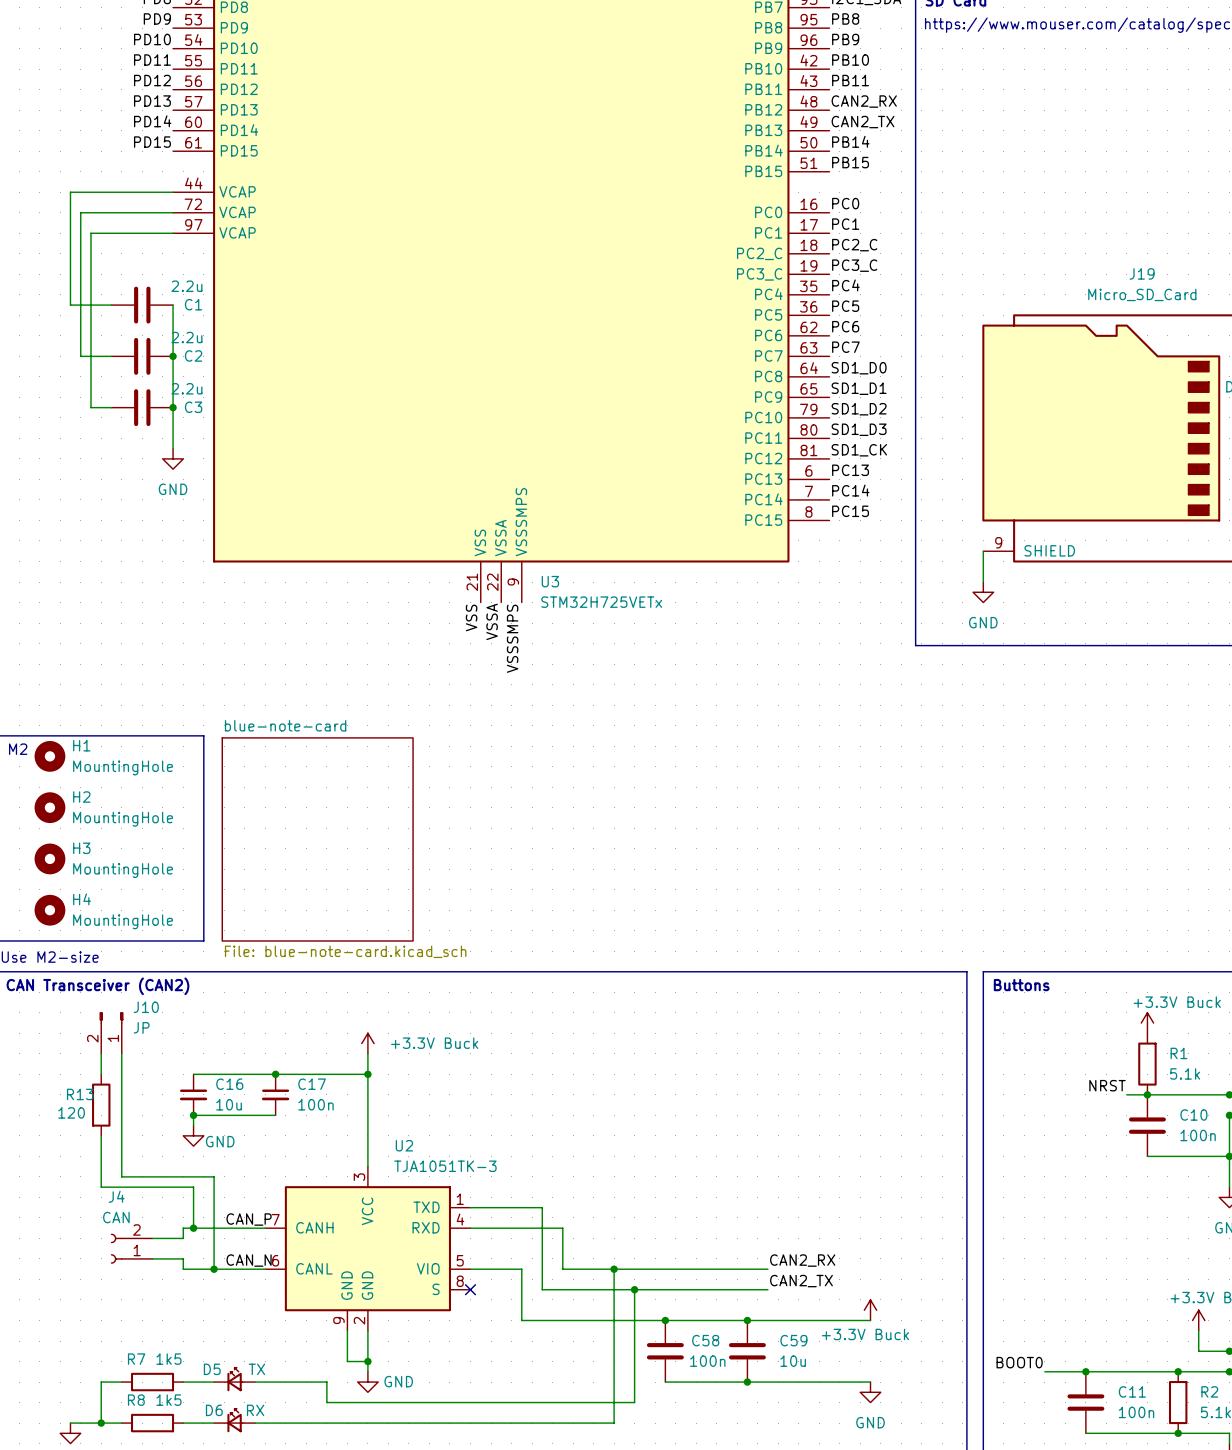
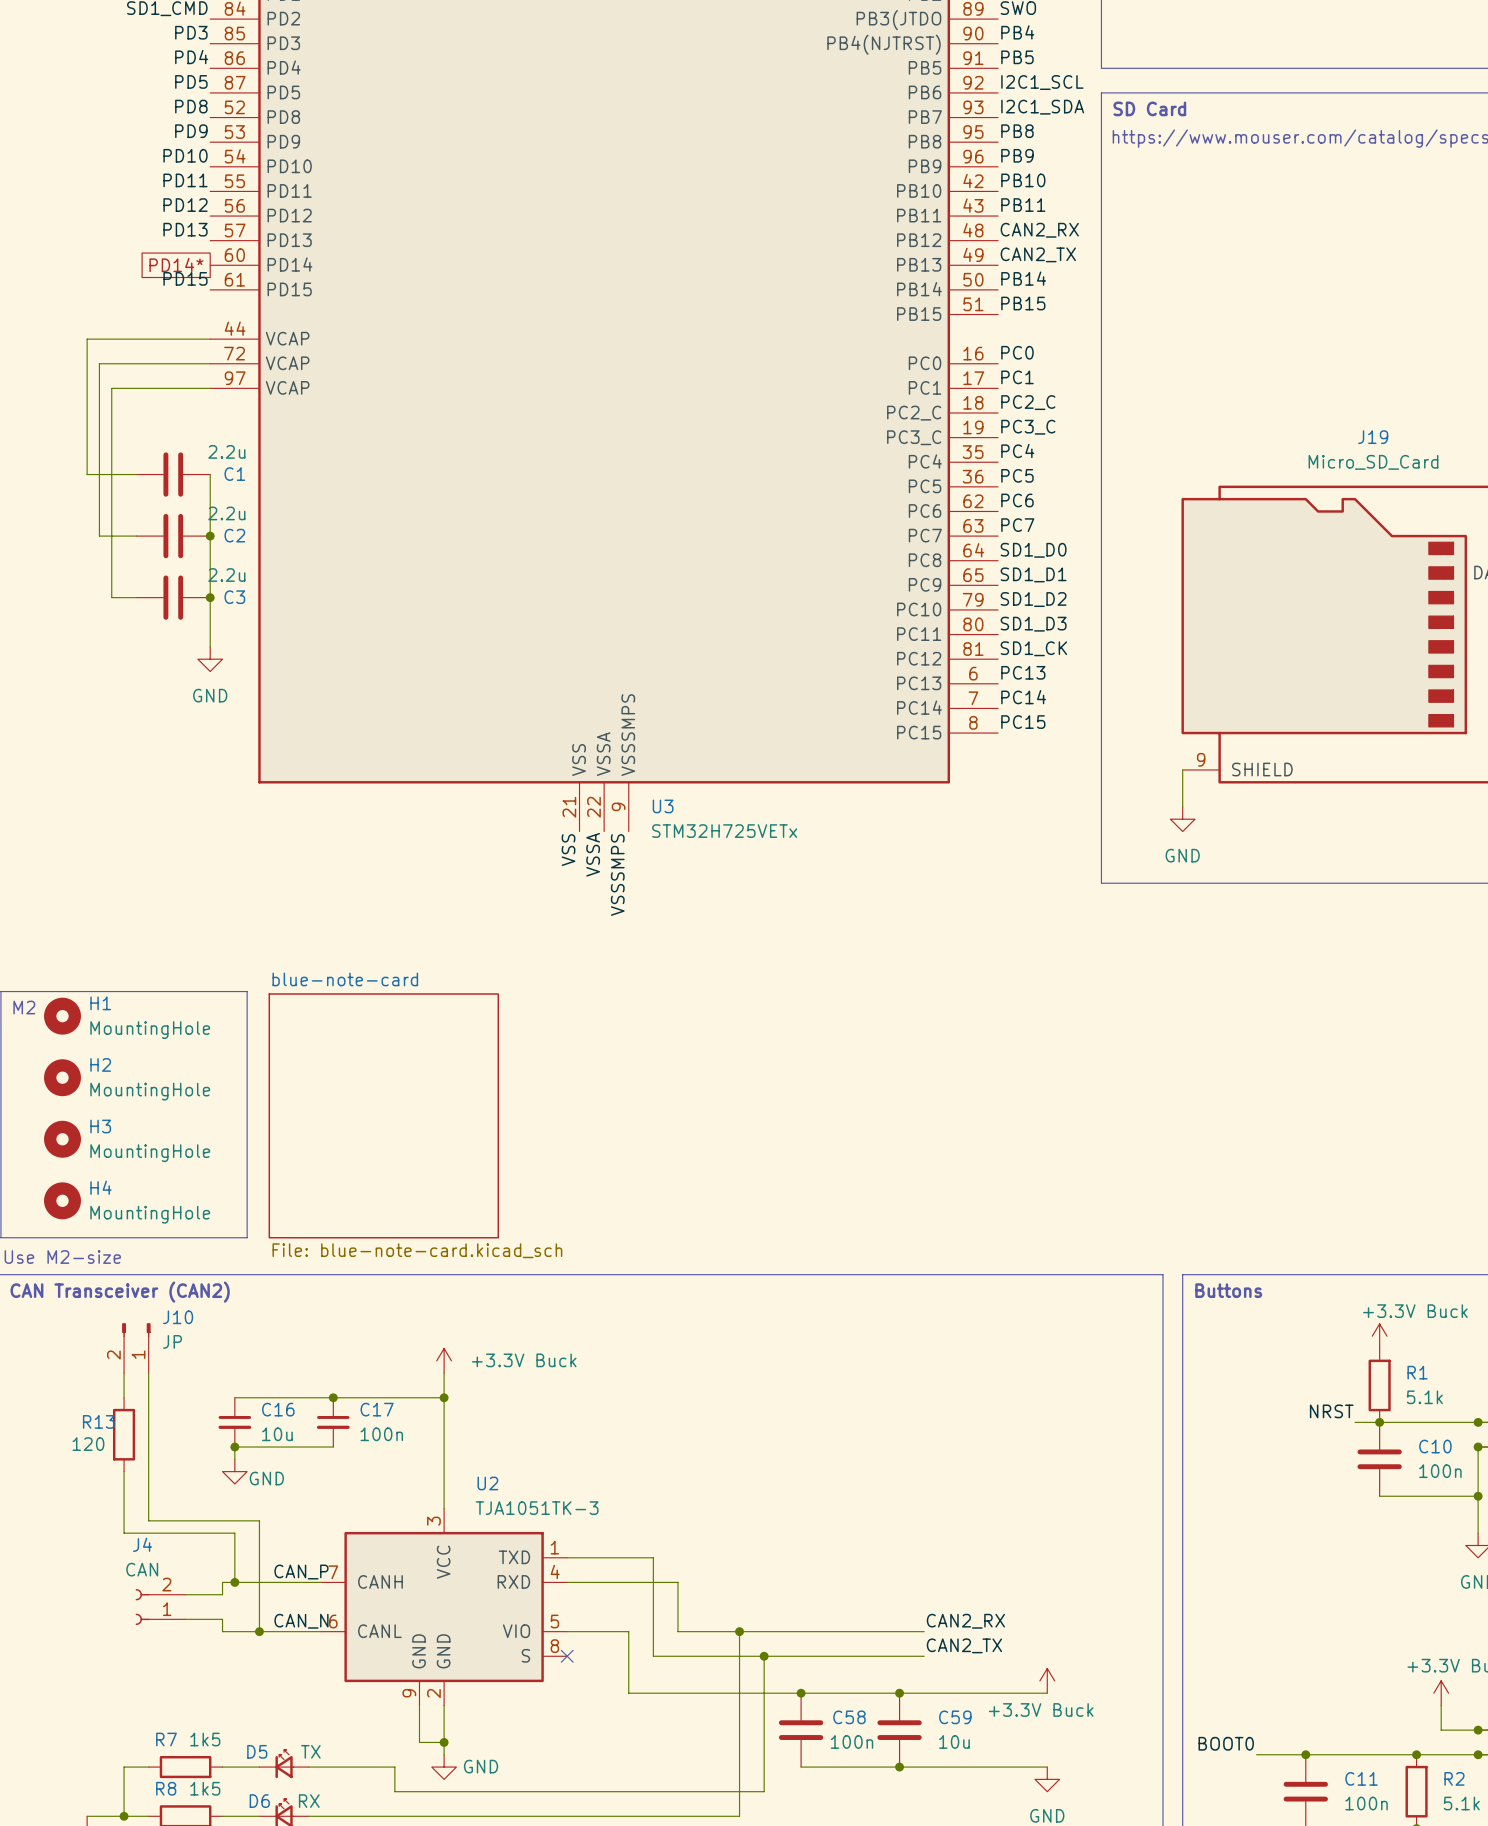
label: PD14 (152, 121) -> none
global label: none -> PD14* (176, 264)

